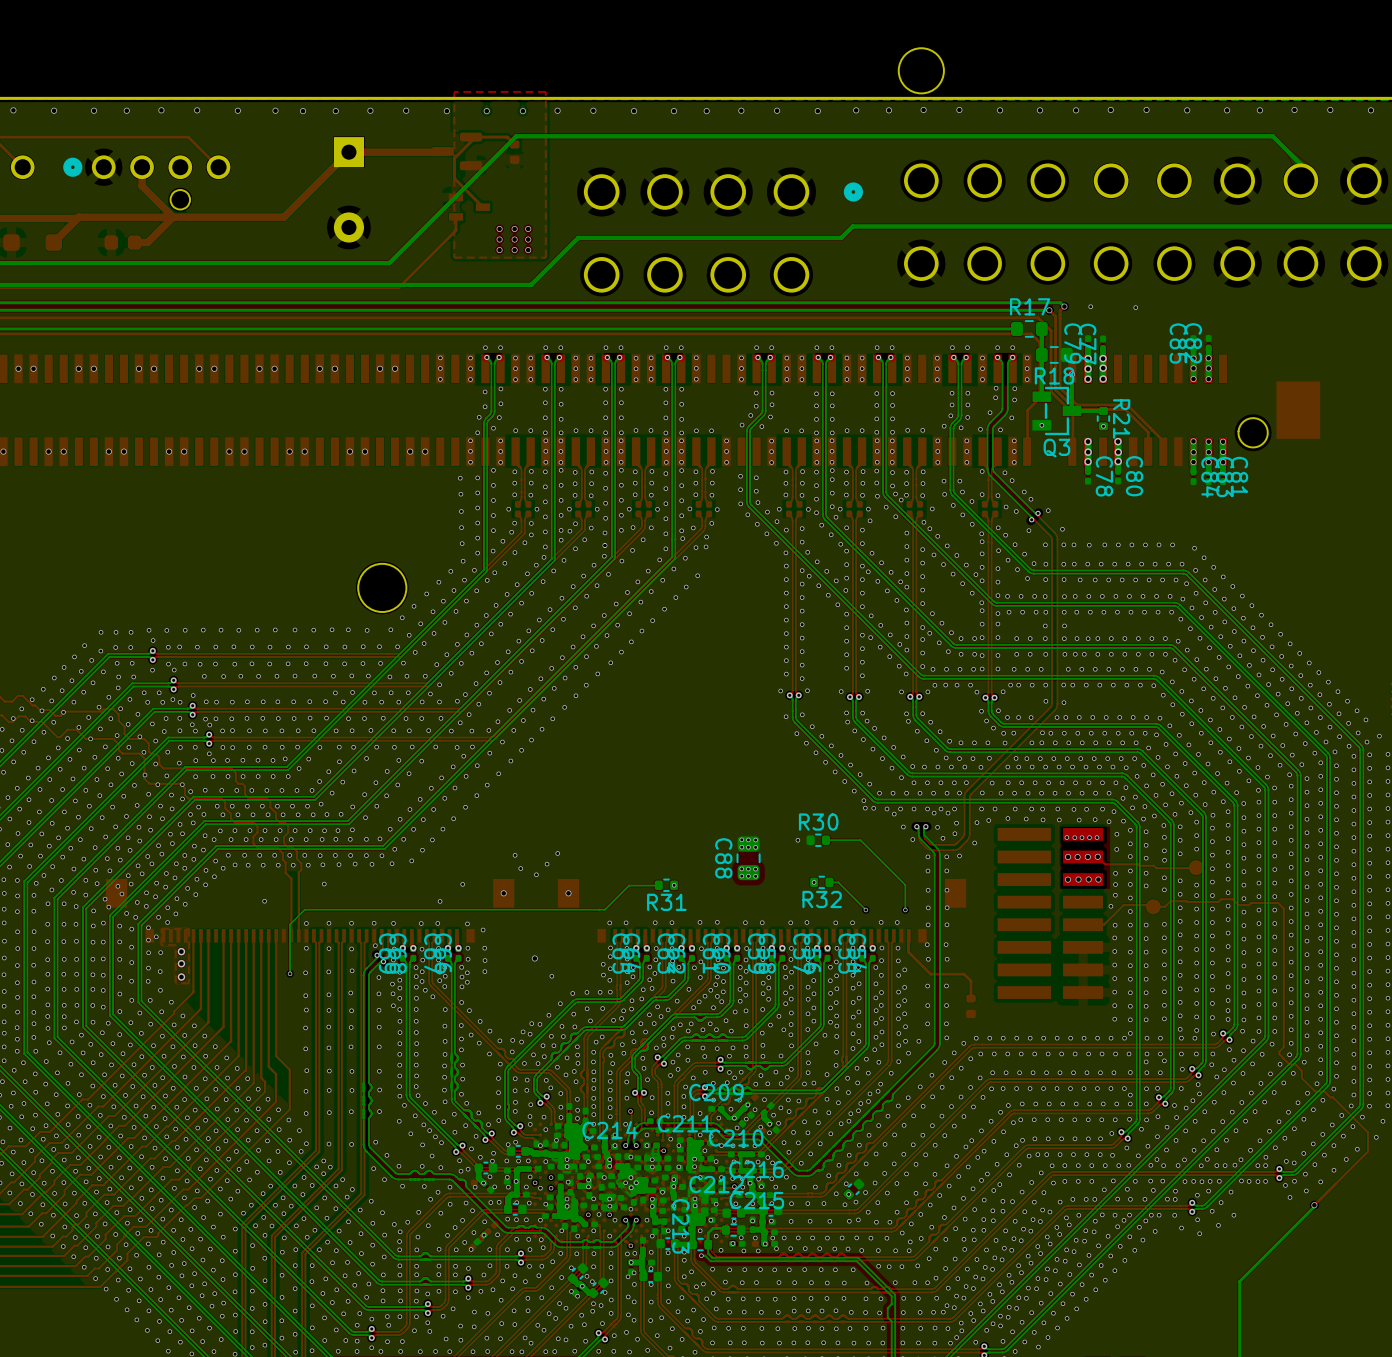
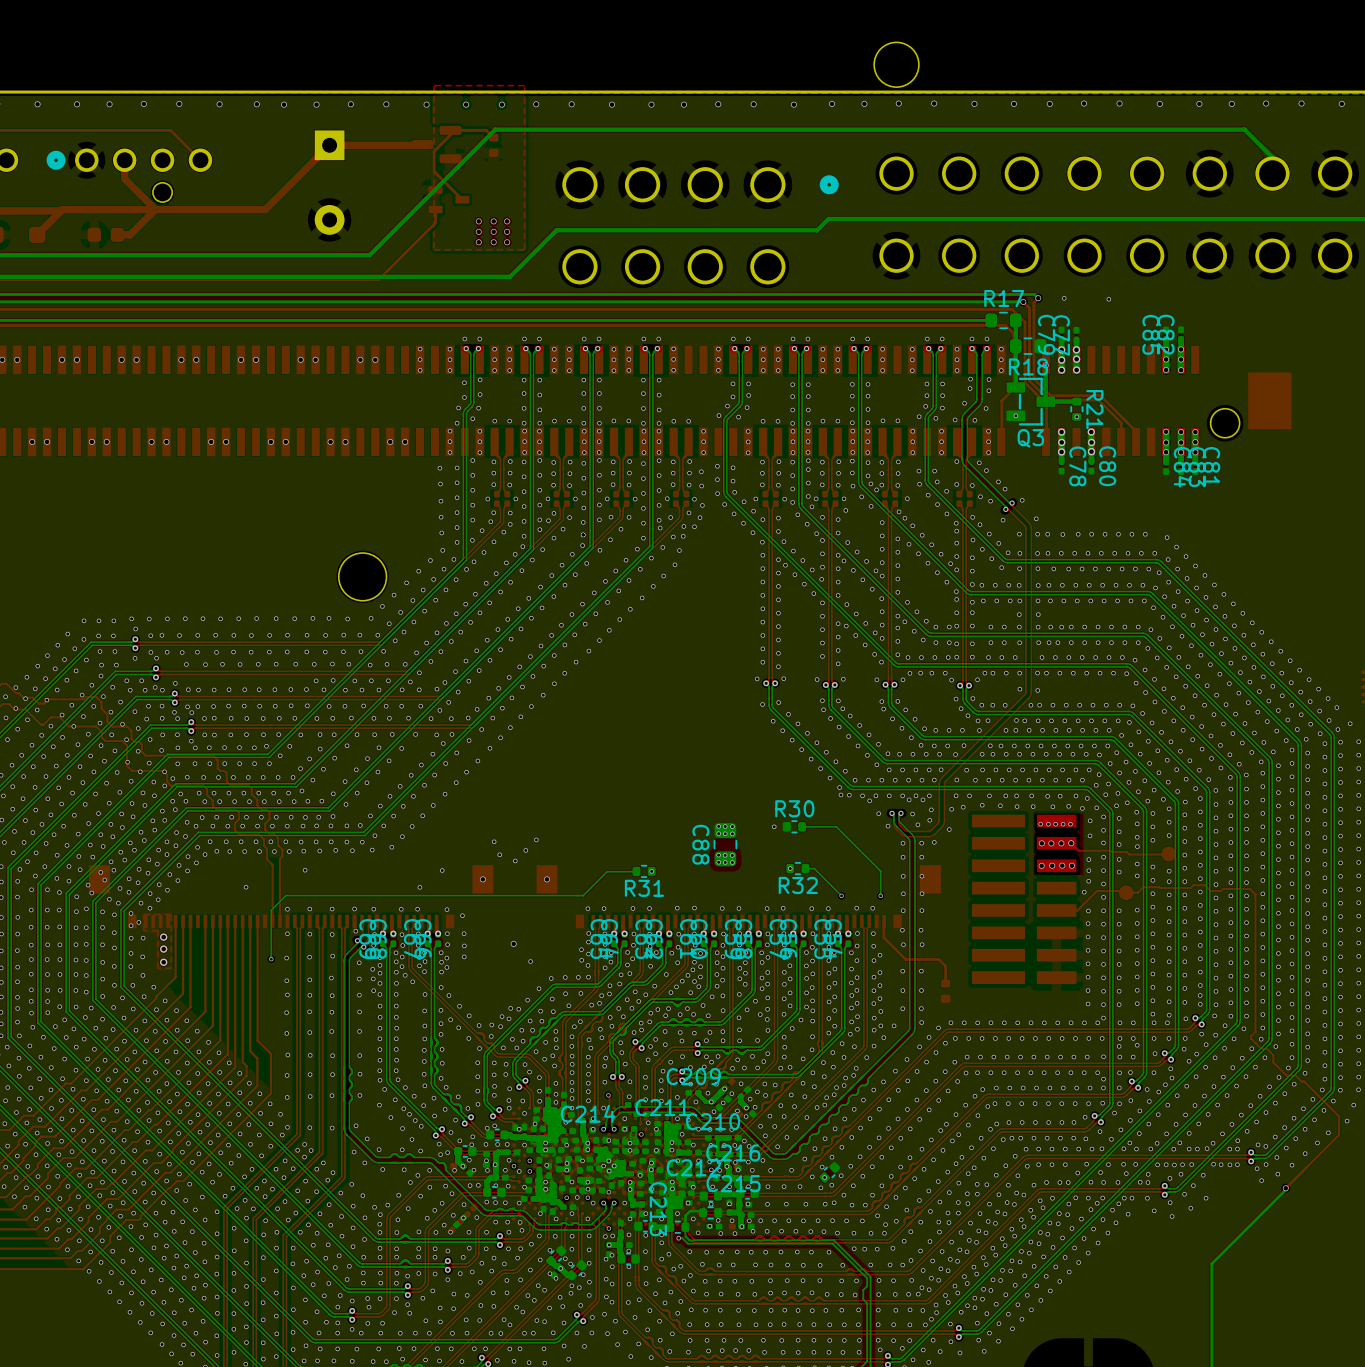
via: none -> (701, 471)
via: none -> (701, 486)
via: none -> (702, 505)
via: none -> (700, 517)
via: none -> (694, 526)
via: none -> (679, 550)

